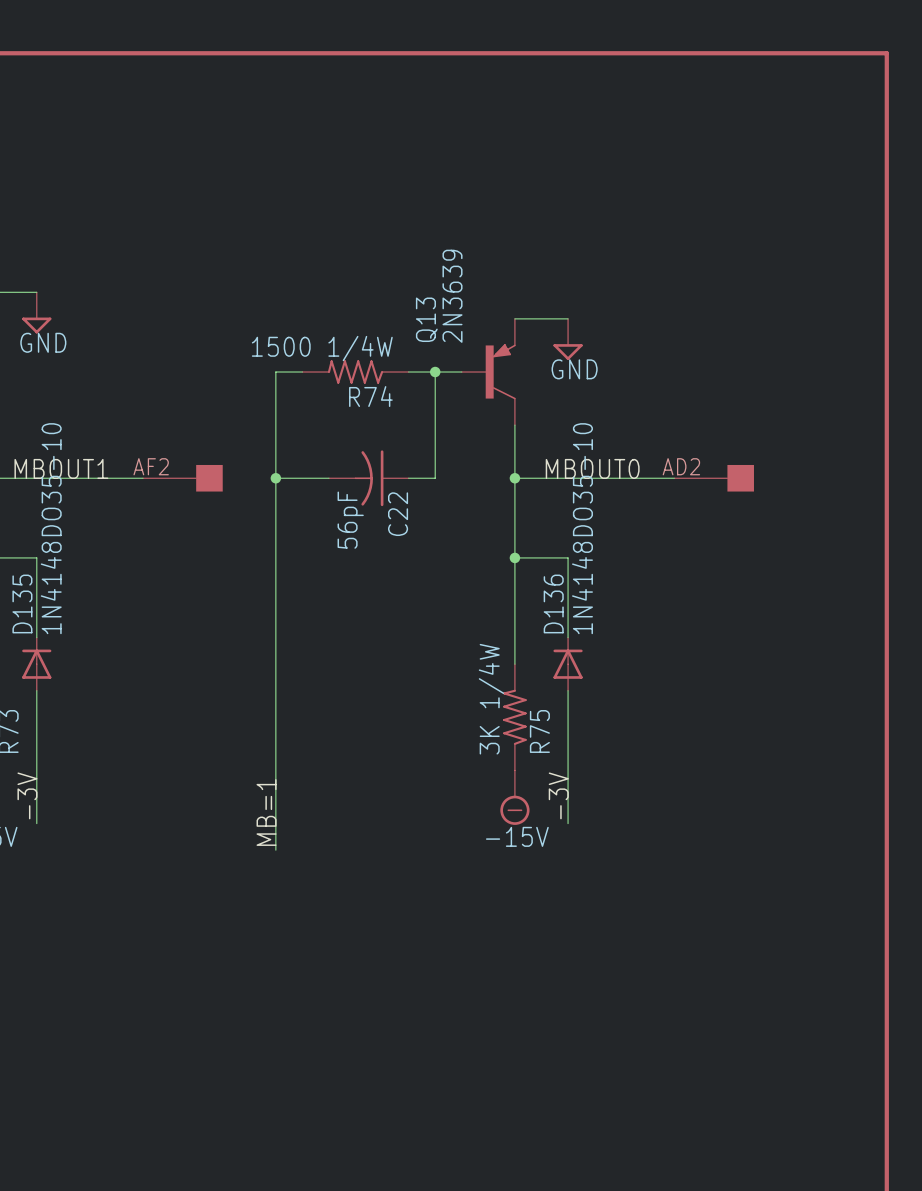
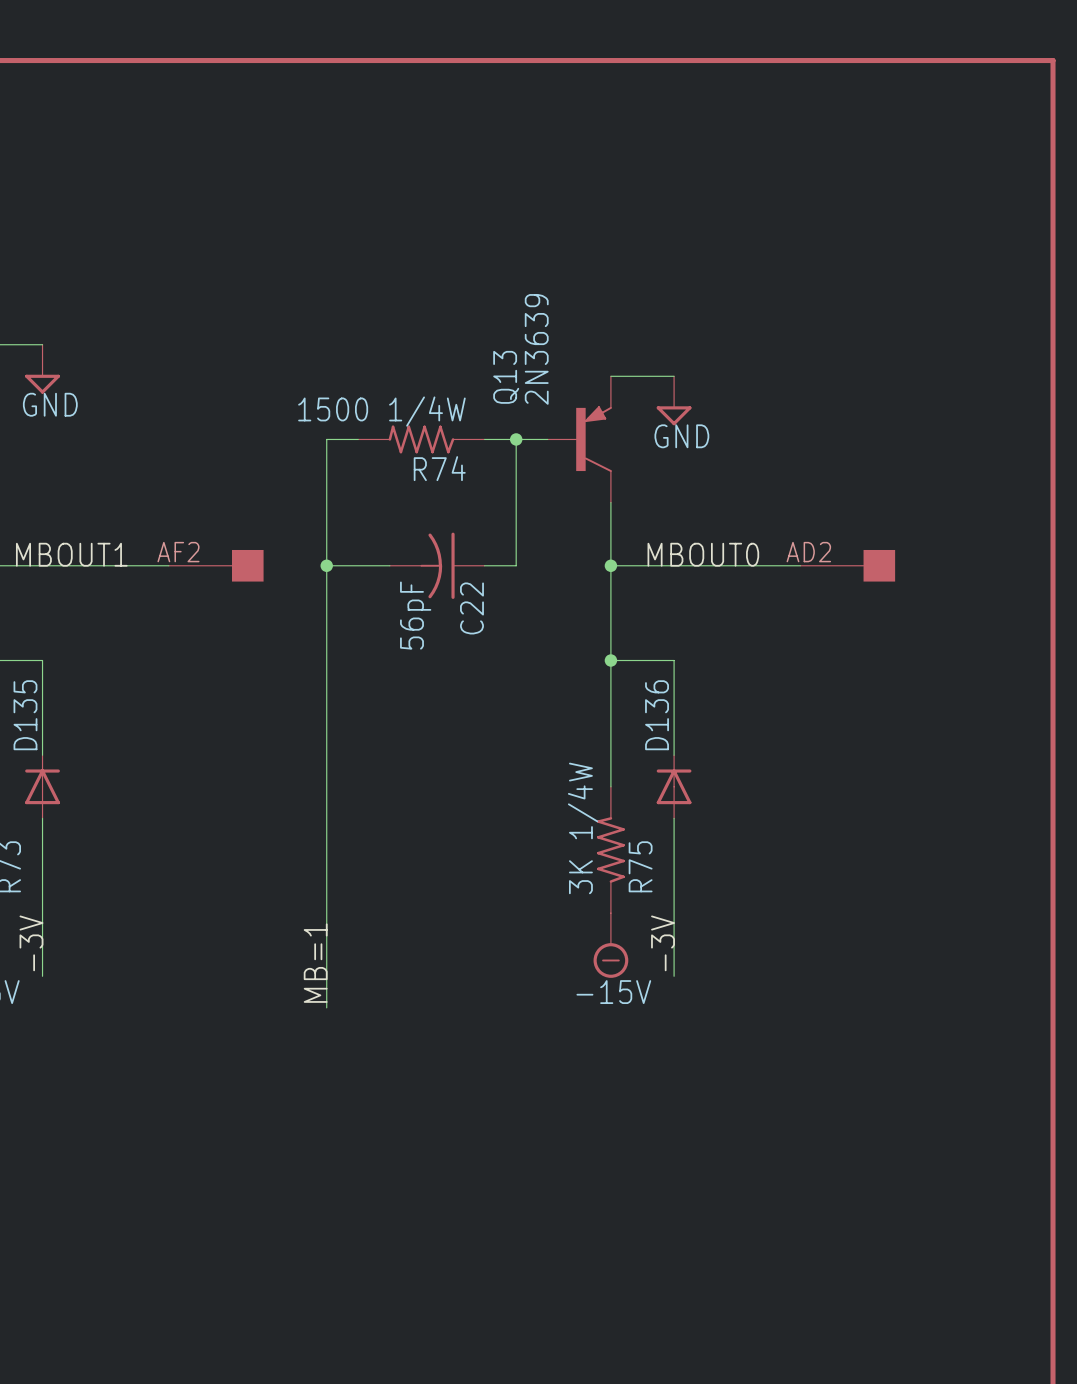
D135 value: 1N4148DO35-10 (51, 528) -> none
D136 value: 1N4148DO35-10 (582, 528) -> none

